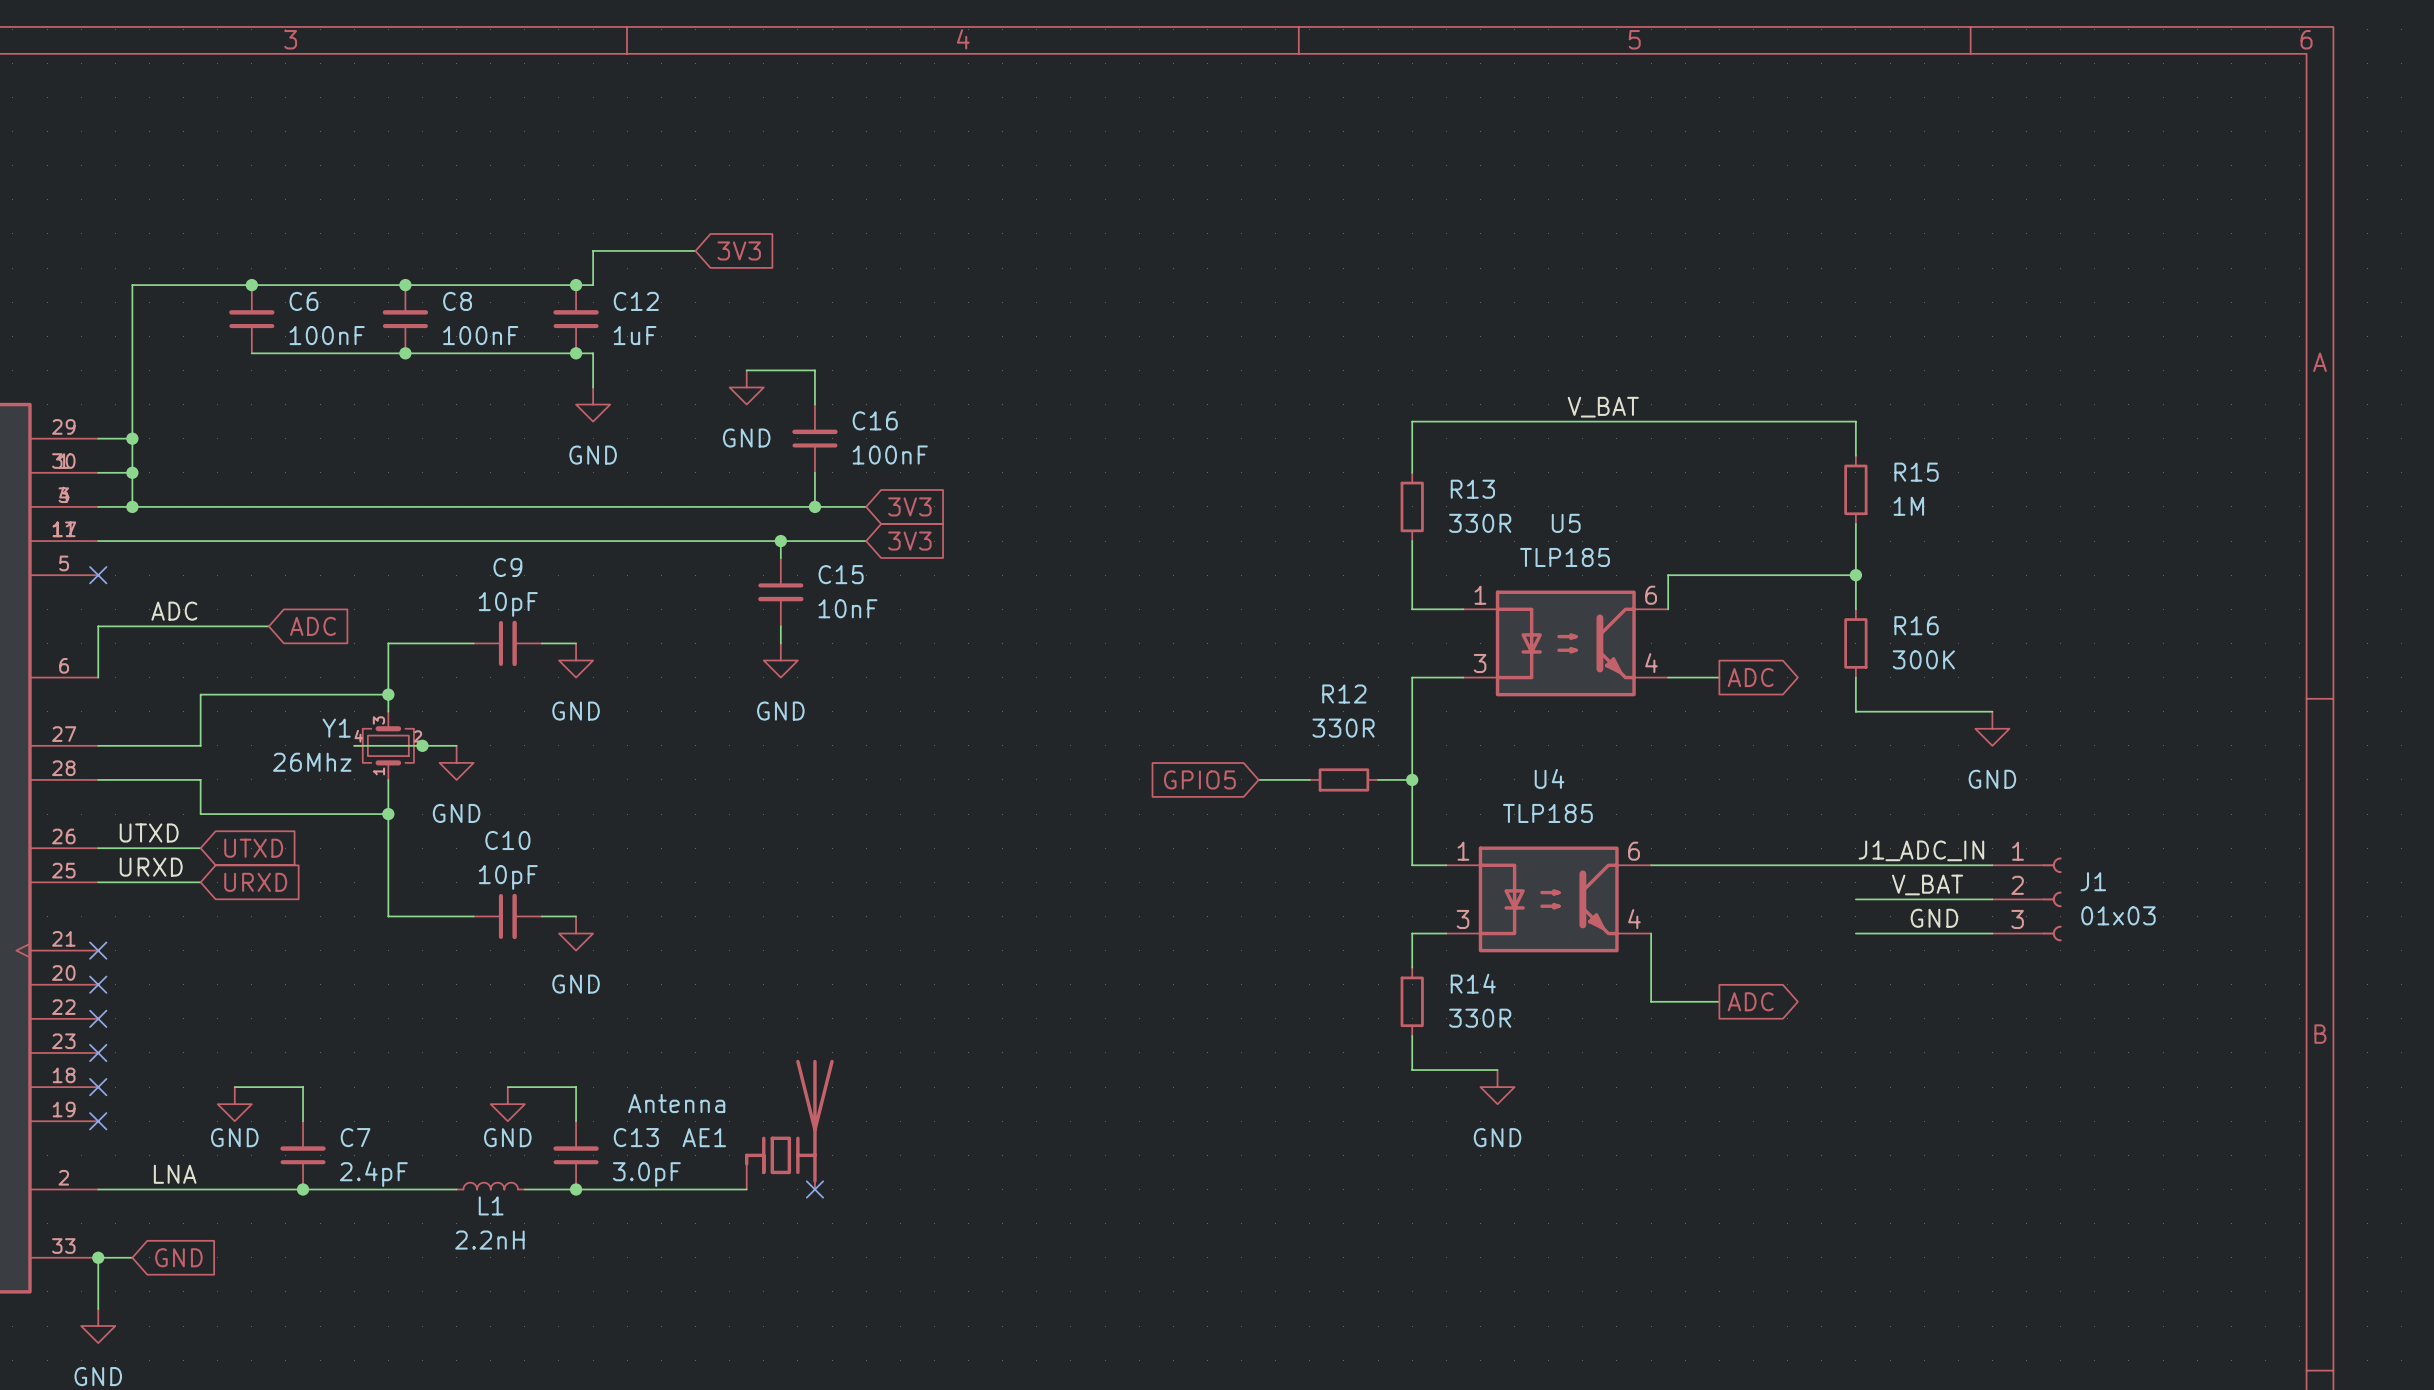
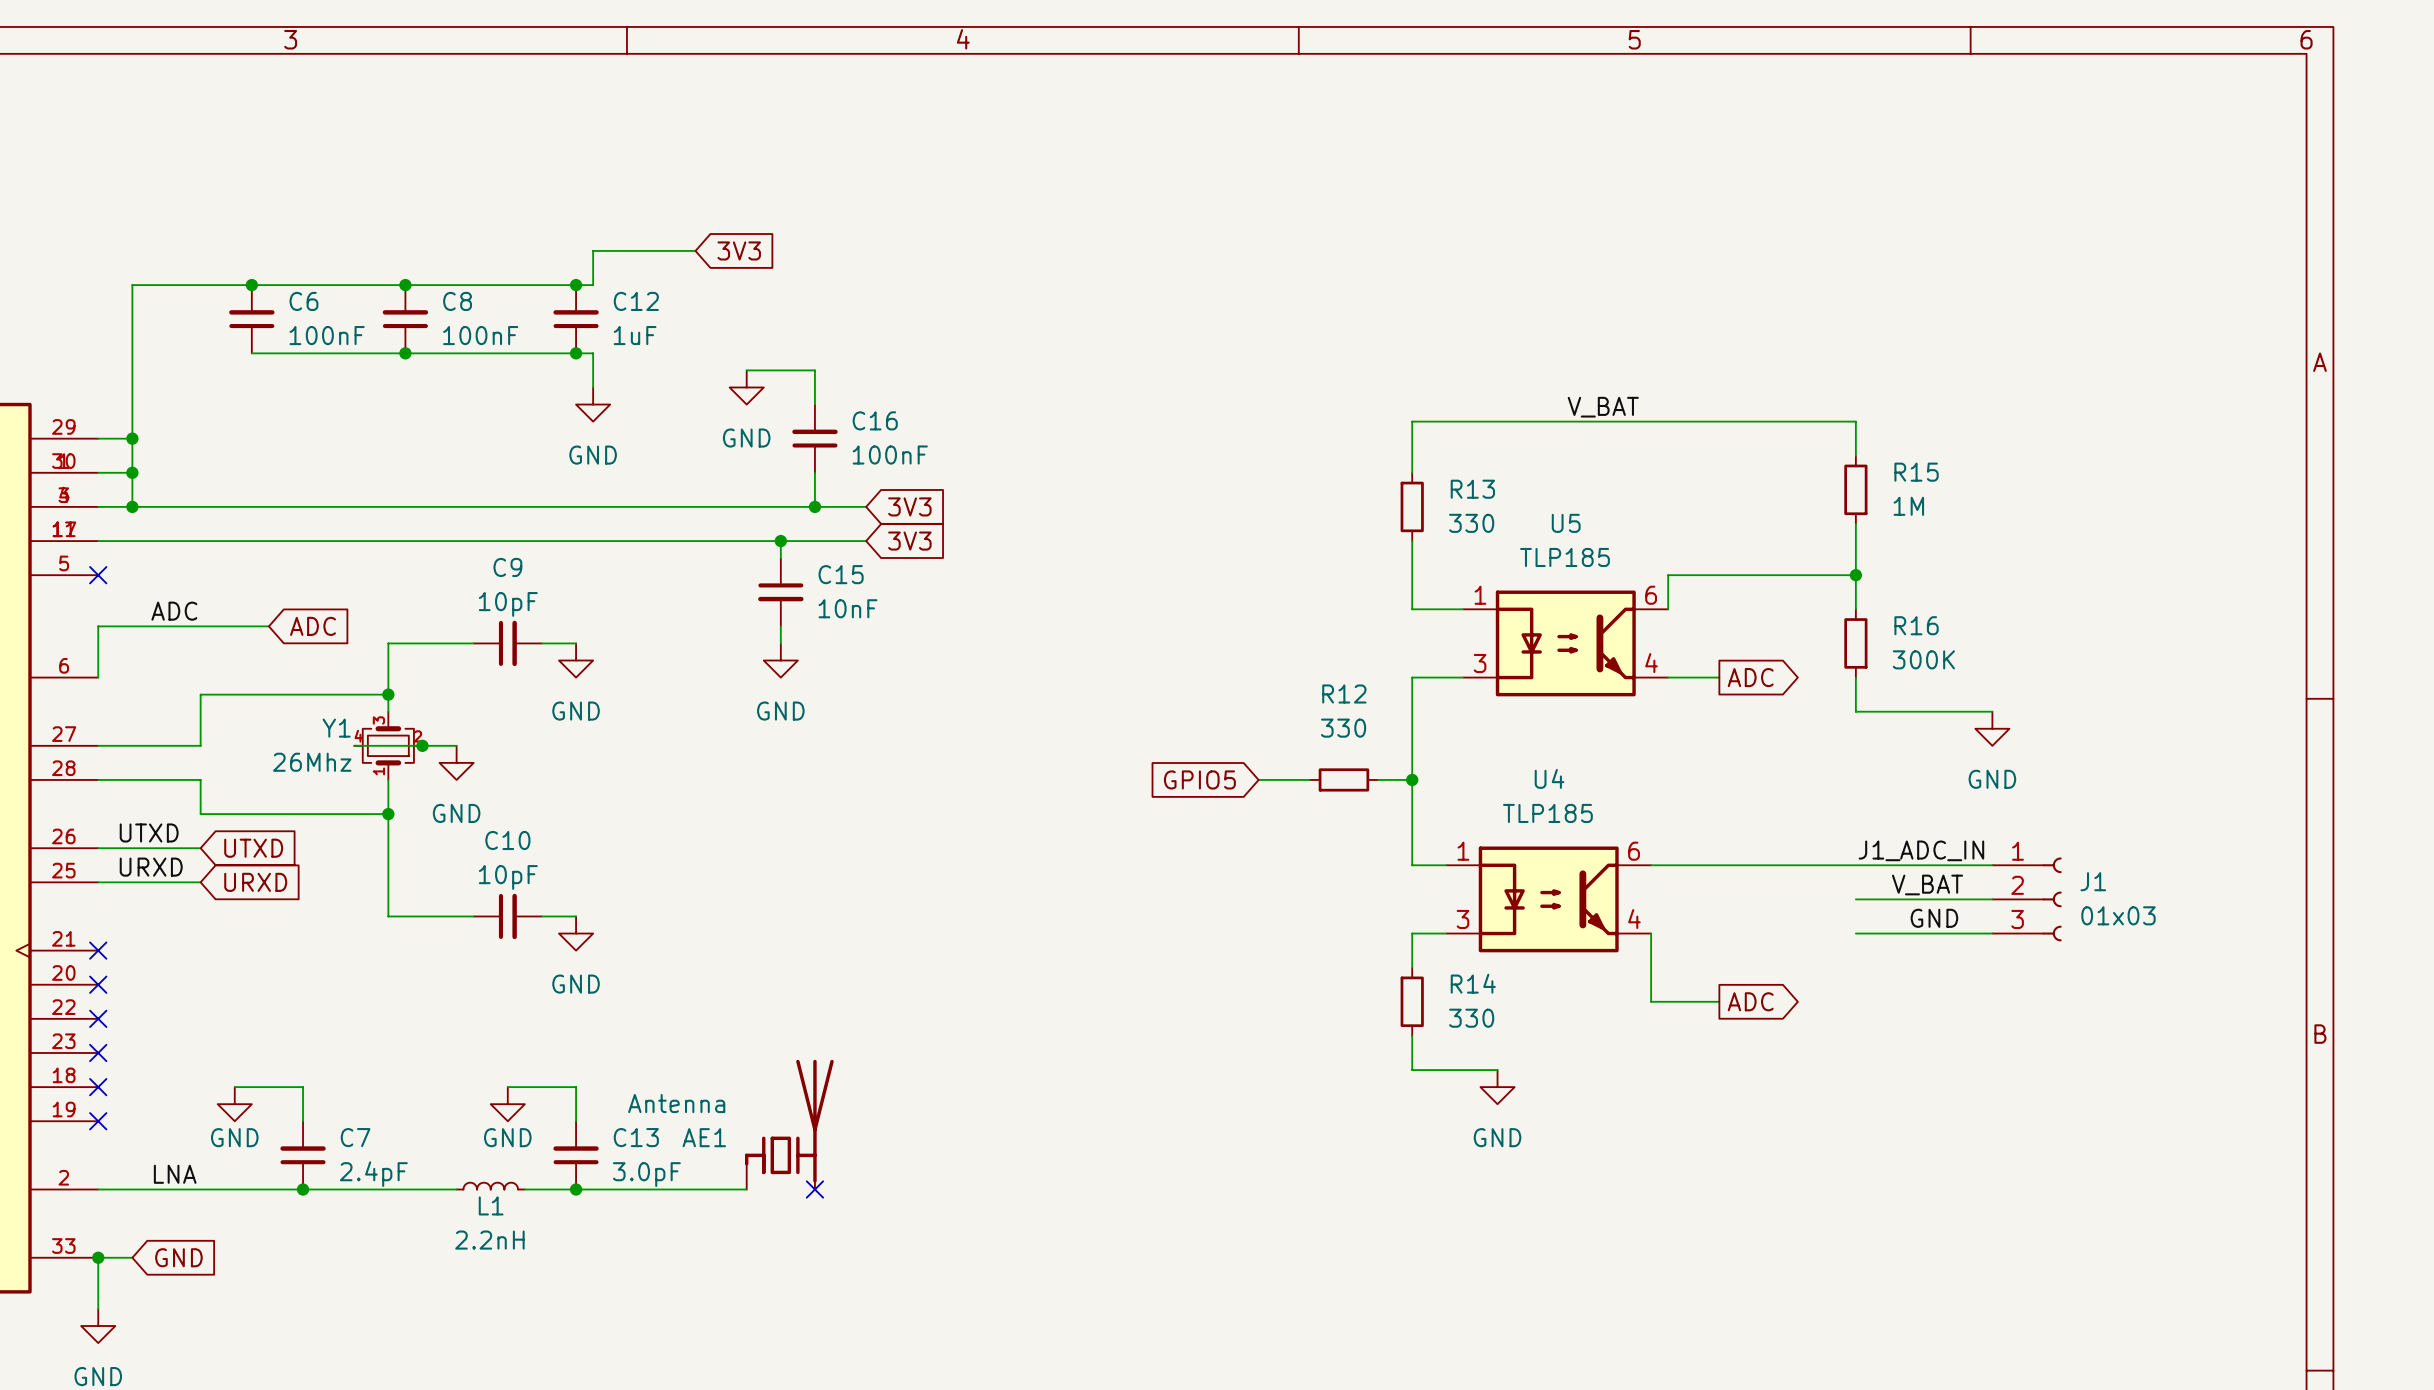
R13 value: 330R (1480, 523) -> 330 (1471, 523)
R12 value: 330R (1343, 728) -> 330 (1343, 728)
R14 value: 330R (1480, 1018) -> 330 (1471, 1018)

